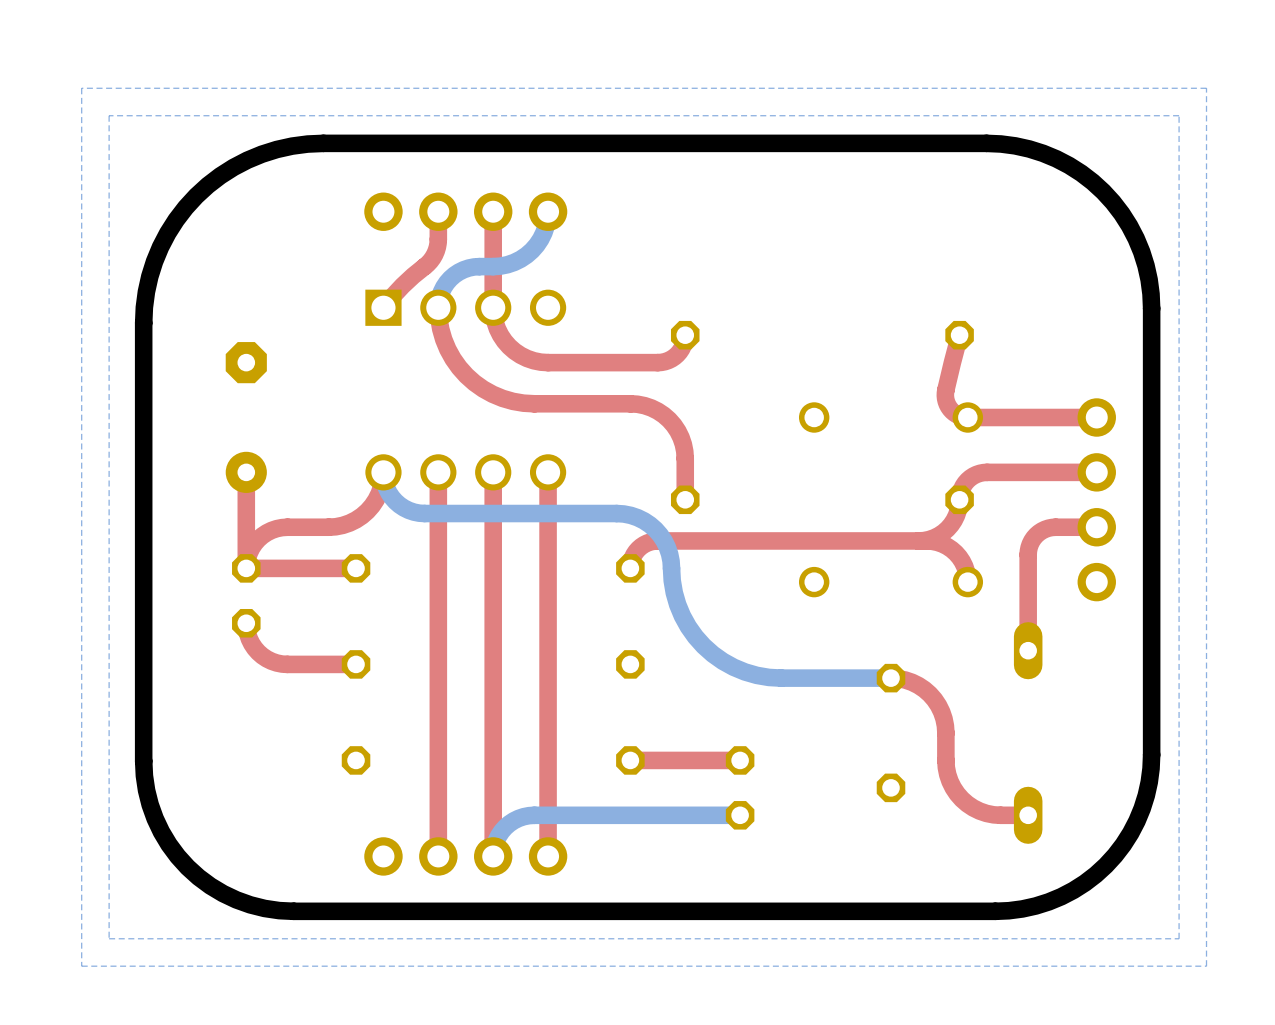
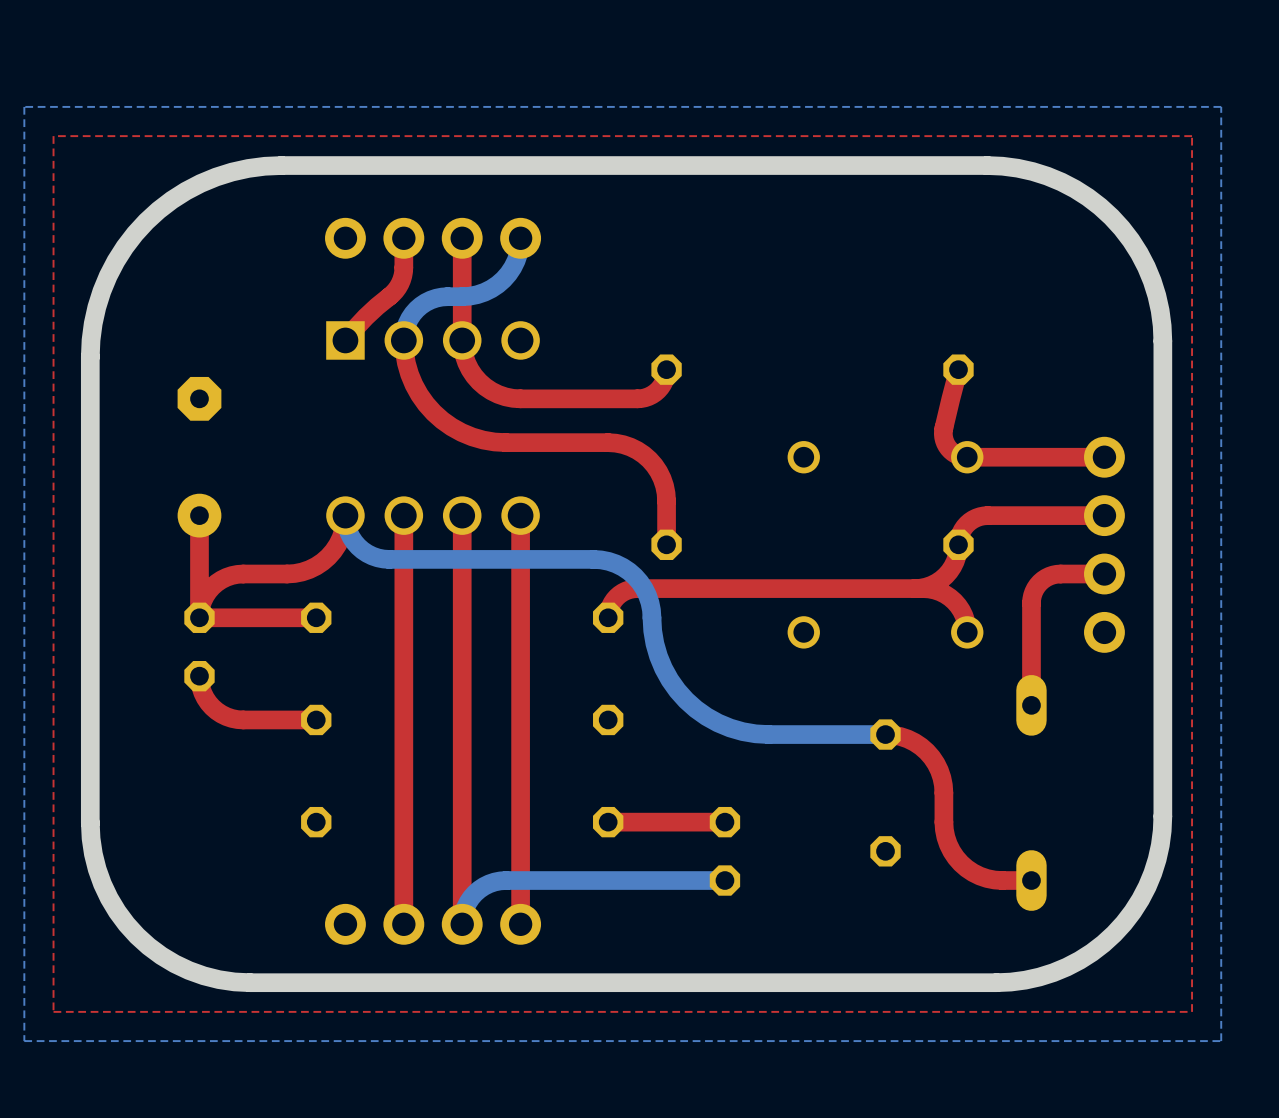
bottom zone outline: (1179, 115) (109, 115) (109, 938) (1179, 938) (1179, 115) -> none
top zone outline: none -> (1192, 136) (53, 136) (53, 1011) (1192, 1011) (1192, 136)

